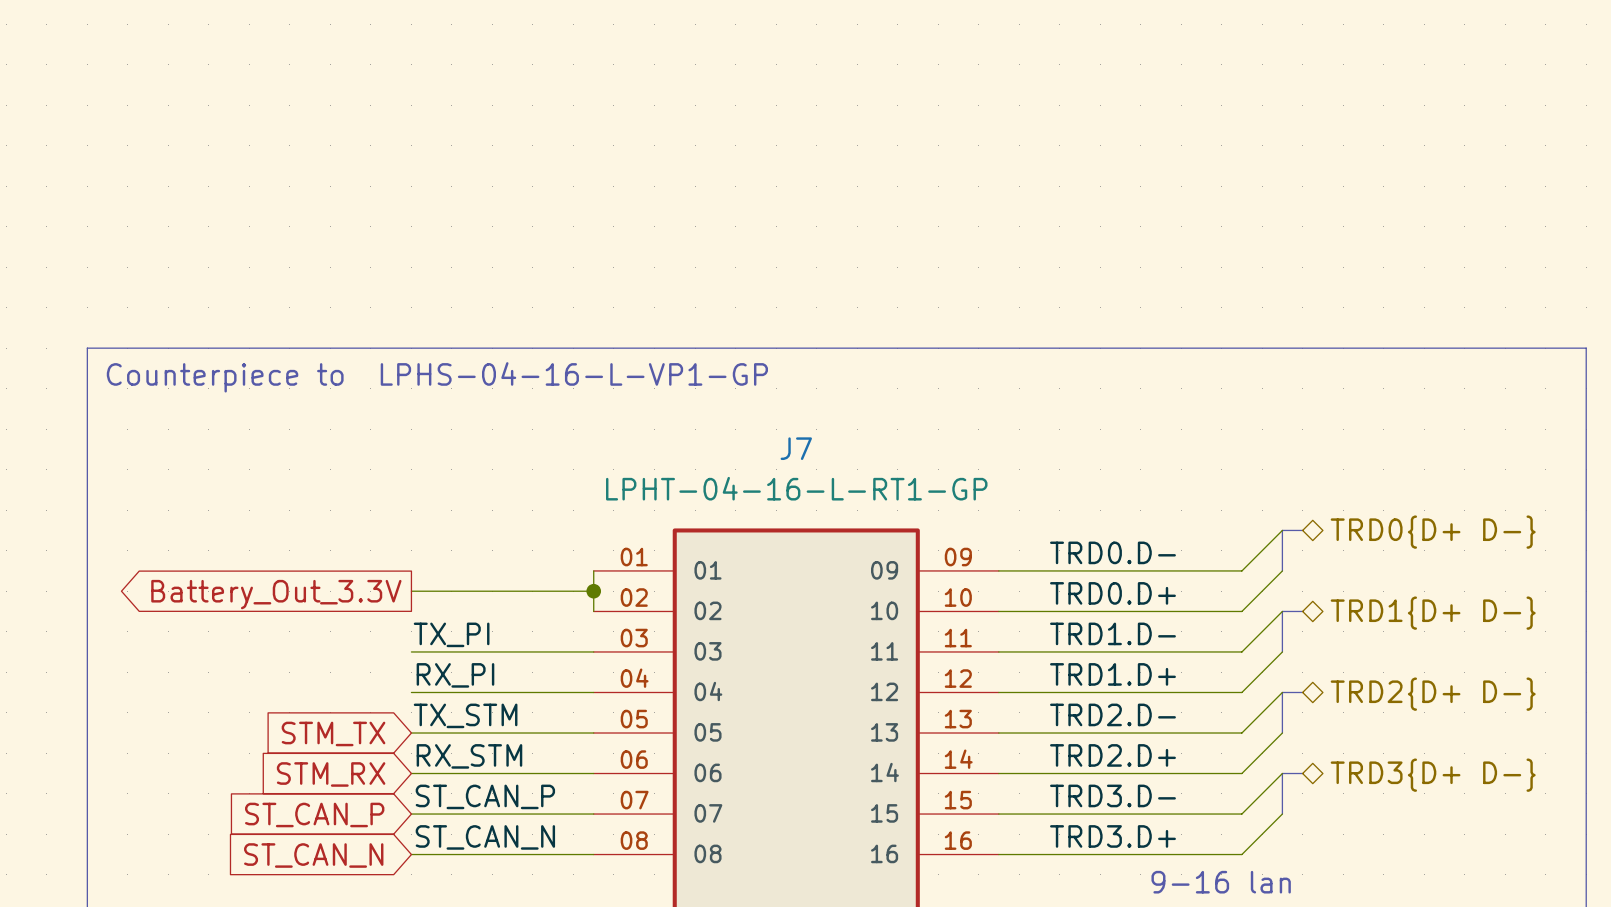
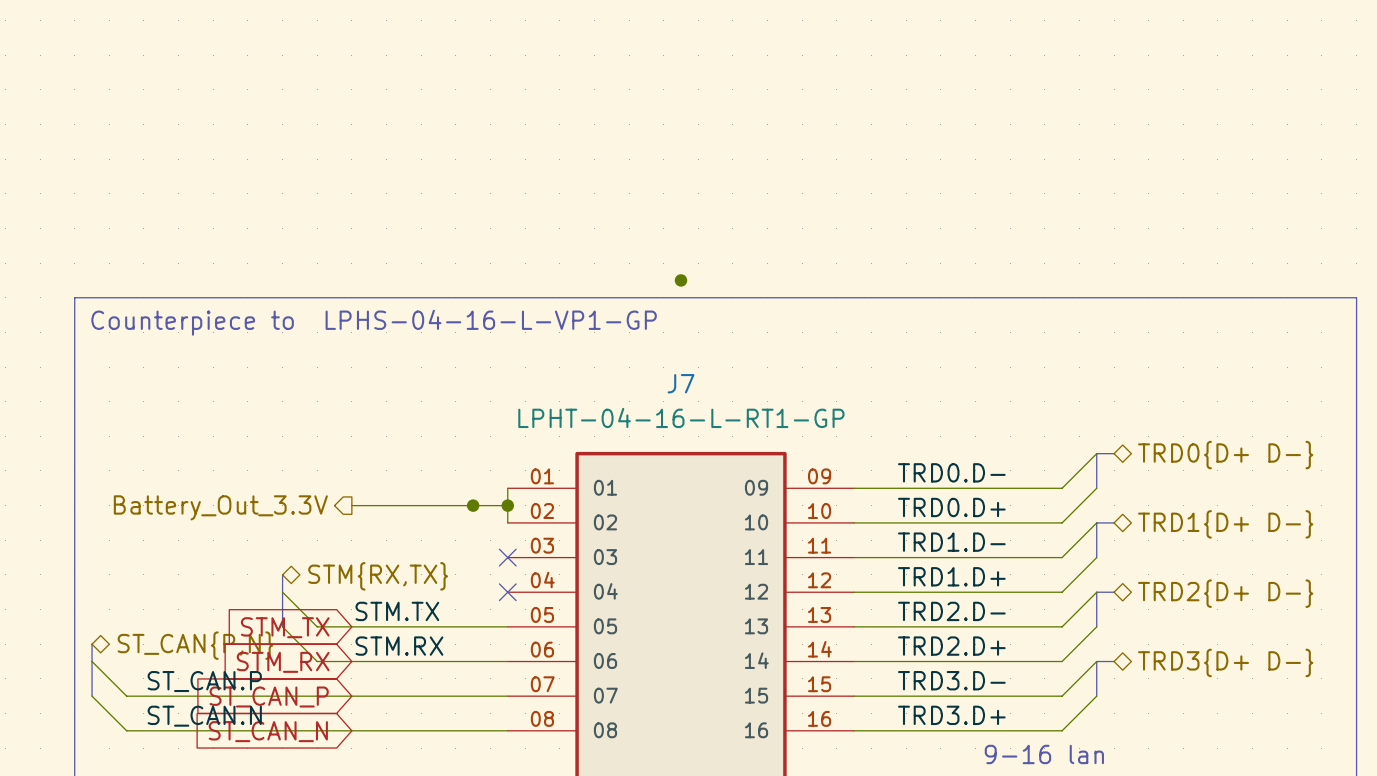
junction: none -> (680, 280)
junction: none -> (473, 505)
hierarchical label: none -> Battery_Out_3.3V (220, 507)
global label: Battery_Out_3.3V (276, 594) -> none
label: TX_PI (451, 634) -> none
wire: (411, 651) (593, 651) -> none
no-connect mark: none -> (507, 557)
bus: none -> (282, 574) (282, 626)
hierarchical label: none -> STM{RX,TX} (378, 576)
label: RX_PI (455, 675) -> none
wire: none -> (282, 592) (317, 626) (351, 626)
wire: (411, 692) (593, 692) -> none
no-connect mark: none -> (507, 592)
label: TX_STM (465, 715) -> STM.TX (397, 611)
wire: none -> (282, 626) (317, 661) (351, 661)
bus: none -> (92, 644) (92, 696)
hierarchical label: none -> ST_CAN{P,N} (195, 645)
label: RX_STM (469, 756) -> STM.RX (399, 646)
wire: none -> (92, 661) (126, 696) (351, 696)
label: none -> ST_CAN.P (204, 681)
label: ST_CAN_P (485, 796) -> none
wire: none -> (92, 696) (126, 730) (351, 730)
label: none -> ST_CAN.N (204, 716)
label: ST_CAN_N (485, 837) -> none

